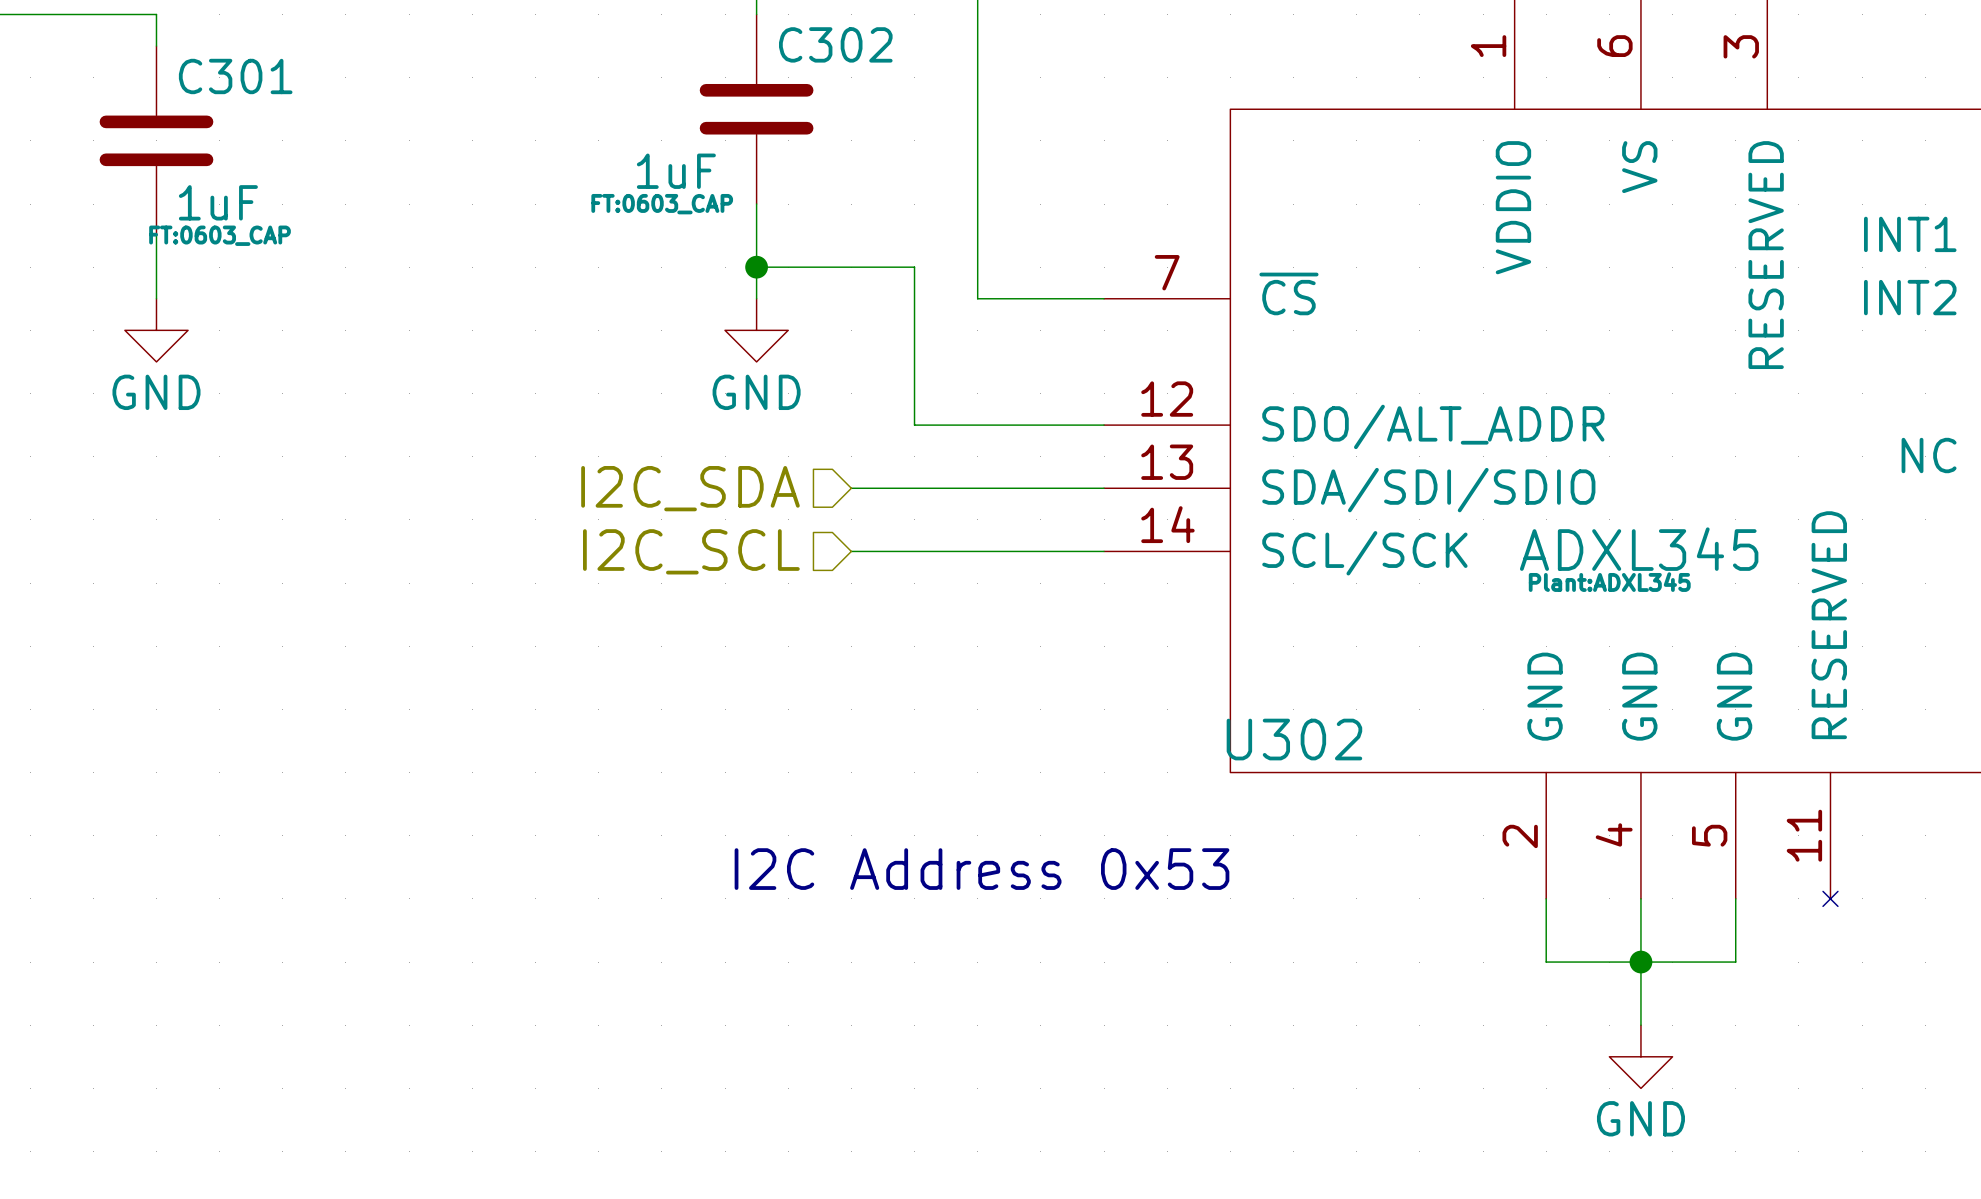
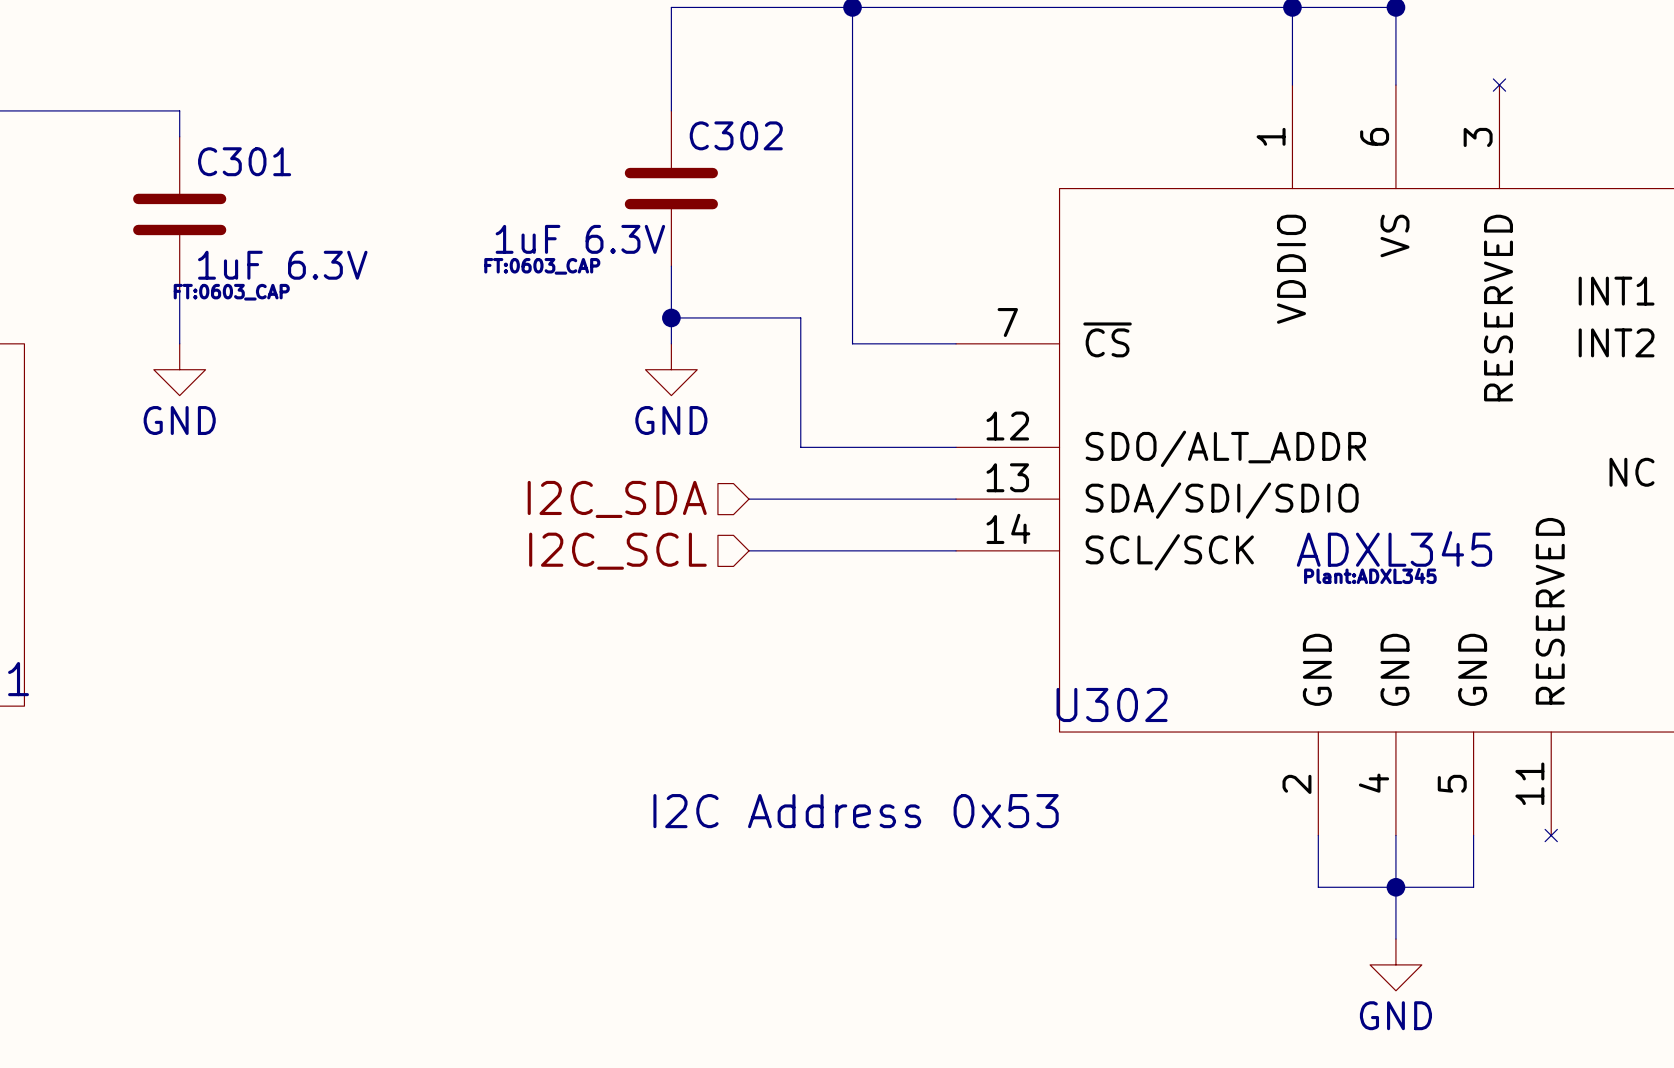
C302 value: 1uF (676, 171) -> 1uF 6.3V (580, 239)
C301 value: 1uF (218, 202) -> 1uF 6.3V (282, 265)
C302 text position: FT:0603_CAP (662, 204) -> FT:0603_CAP (542, 266)

